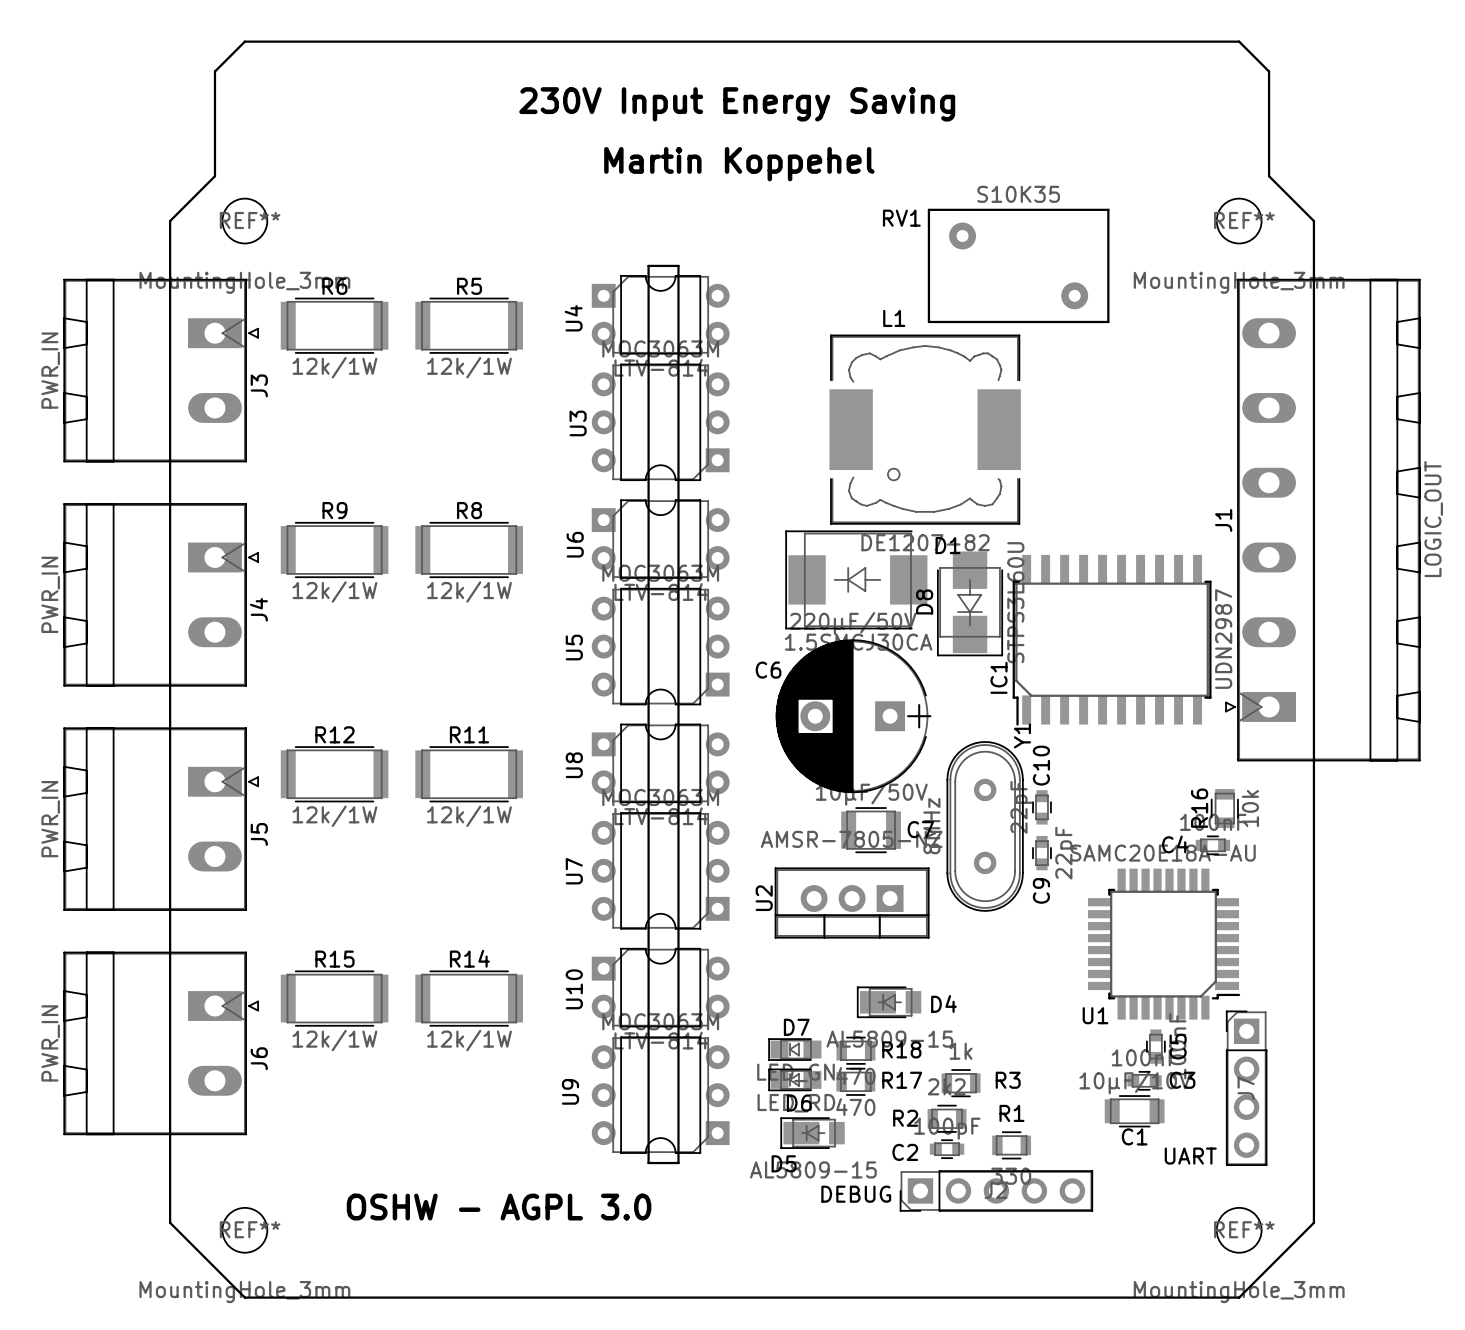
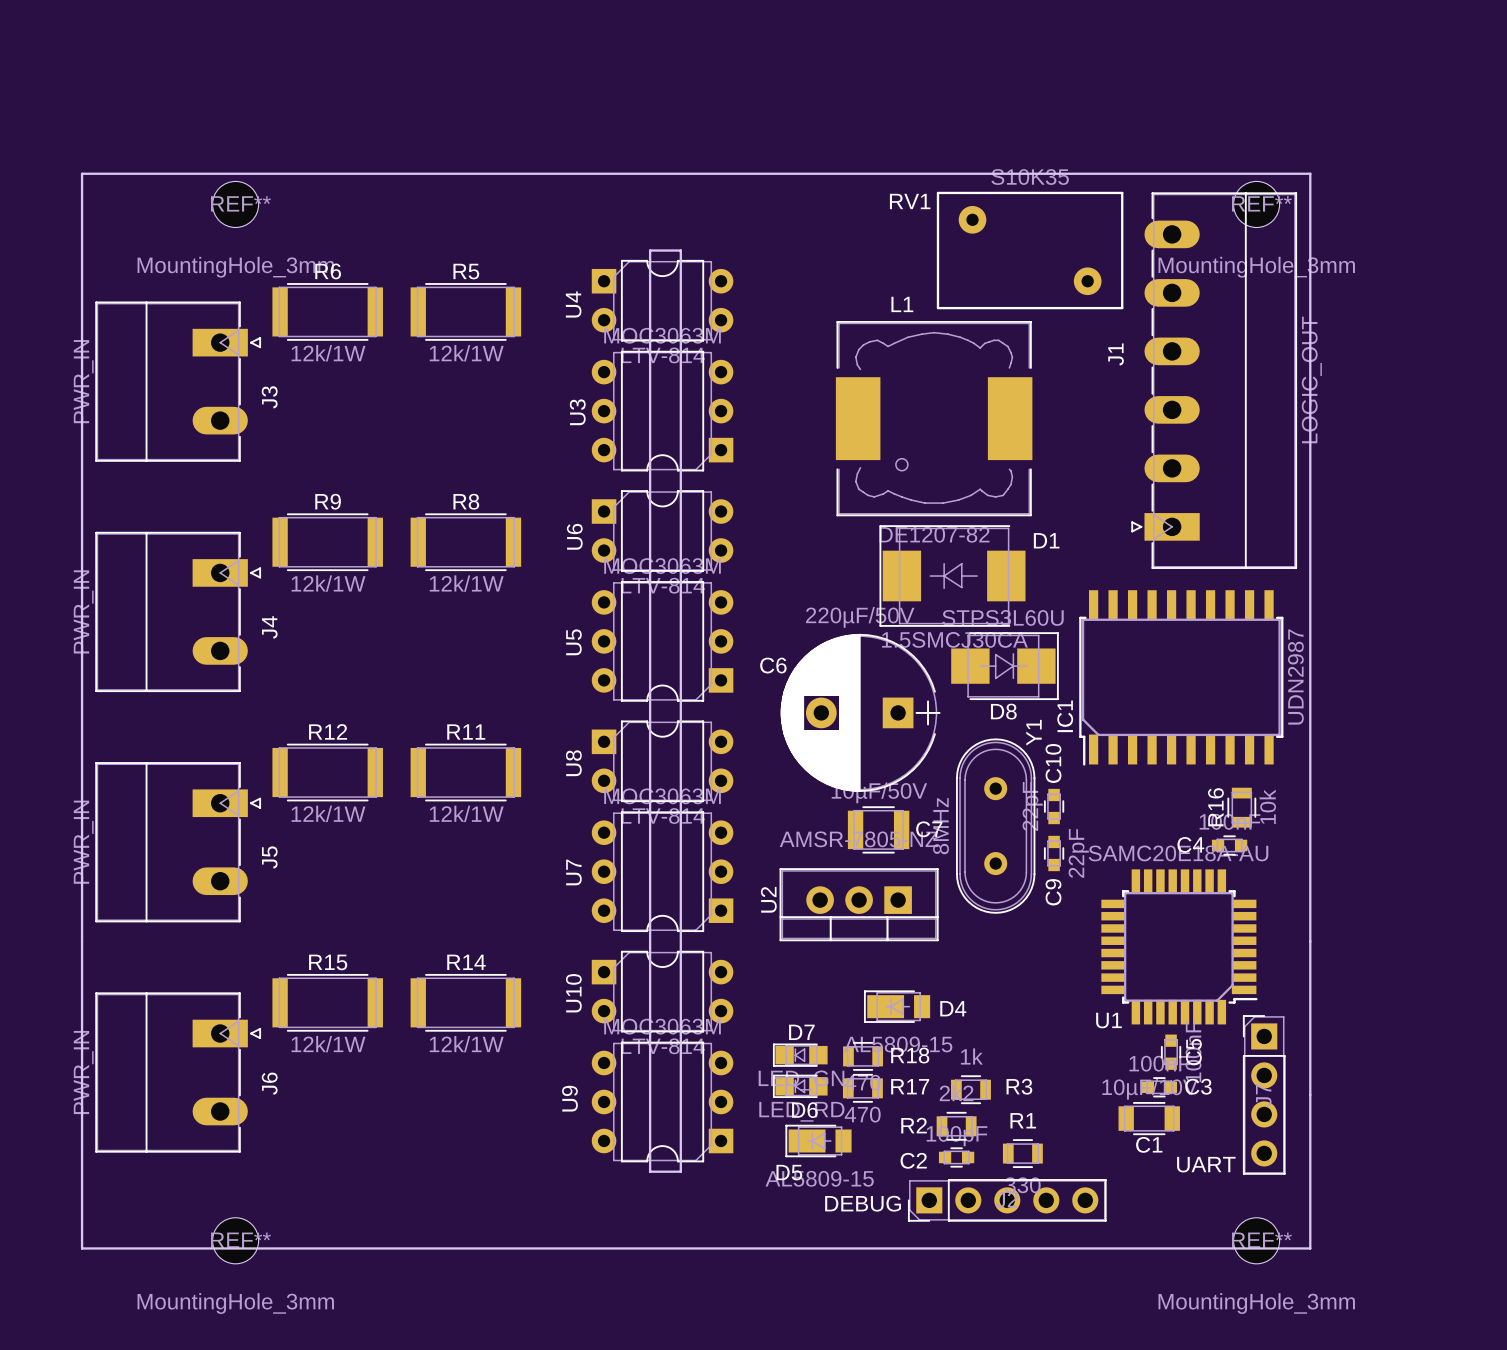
board edge: (244, 41) (1239, 41) (1269, 71) (1269, 176) (1313, 221) (1313, 1222) (1239, 1297) (244, 1297) (170, 1222) (170, 221) (214, 176) (214, 71) (244, 41) -> (82, 173) (82, 1248) (1310, 1248) (1310, 173) (82, 173)
text: 230V Input Energy Saving (737, 104) -> none
text: Martin Koppehel (739, 164) -> none
J3 footprint: [63, 278, 259, 463] -> [95, 301, 262, 462]
J1 footprint: [1225, 278, 1421, 762] -> [1131, 192, 1298, 569]
J4 footprint: [63, 503, 259, 687] -> [95, 531, 262, 693]
D1 position: (856, 579) -> (952, 576)
D8 rotation: 0° (970, 603) -> 90° counterclockwise (1005, 666)
D8 position: (970, 603) -> (1005, 666)
IC1 position: (1112, 640) -> (1181, 677)
J5 footprint: [63, 727, 259, 911] -> [95, 762, 262, 923]
J6 footprint: [63, 951, 259, 1136] -> [95, 992, 262, 1153]
text: OSHW - AGPL 3.0 (499, 1207) -> none

